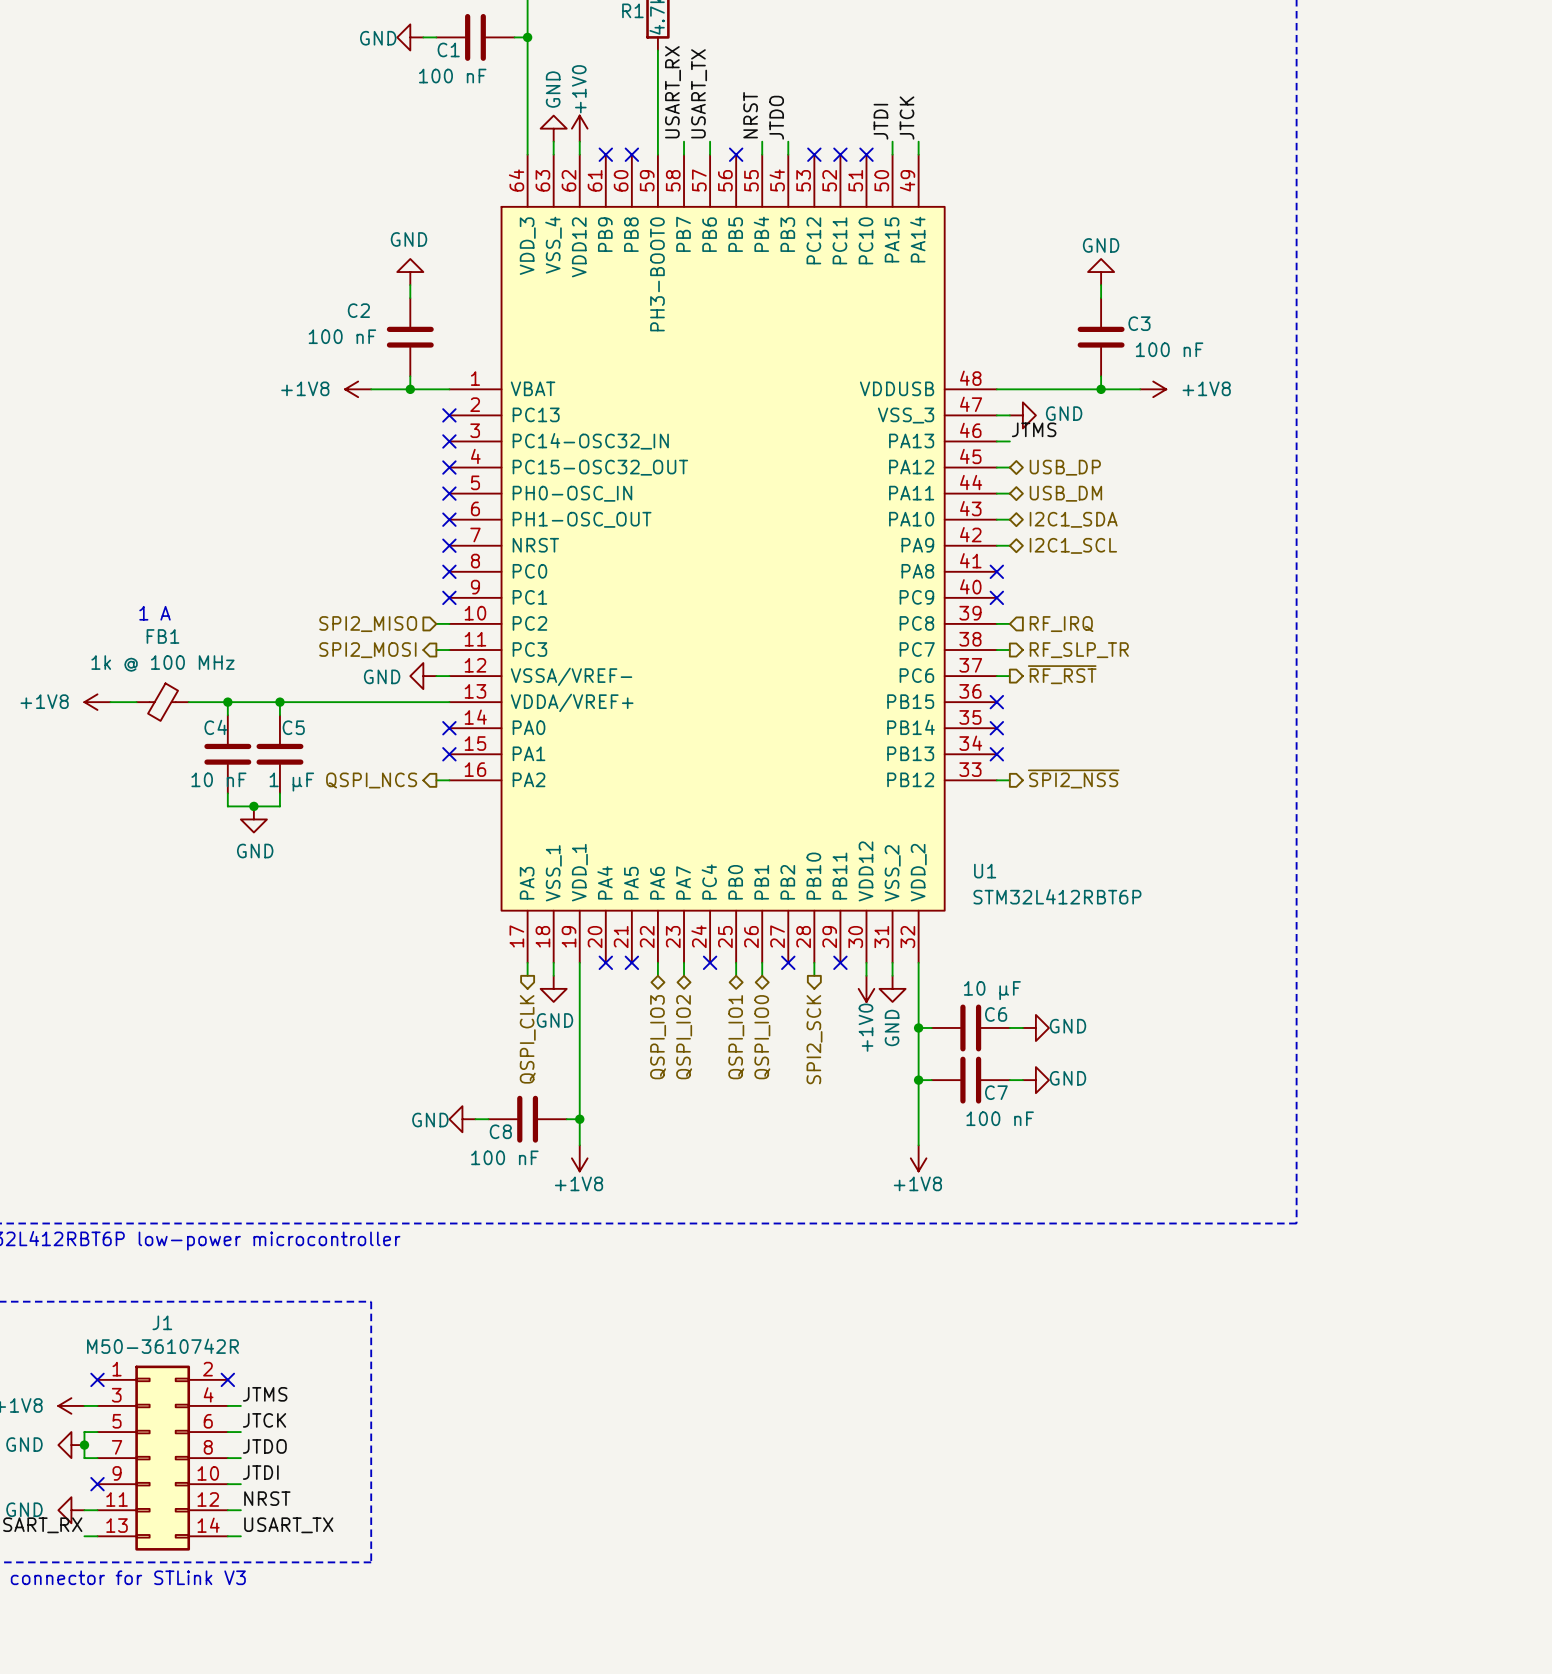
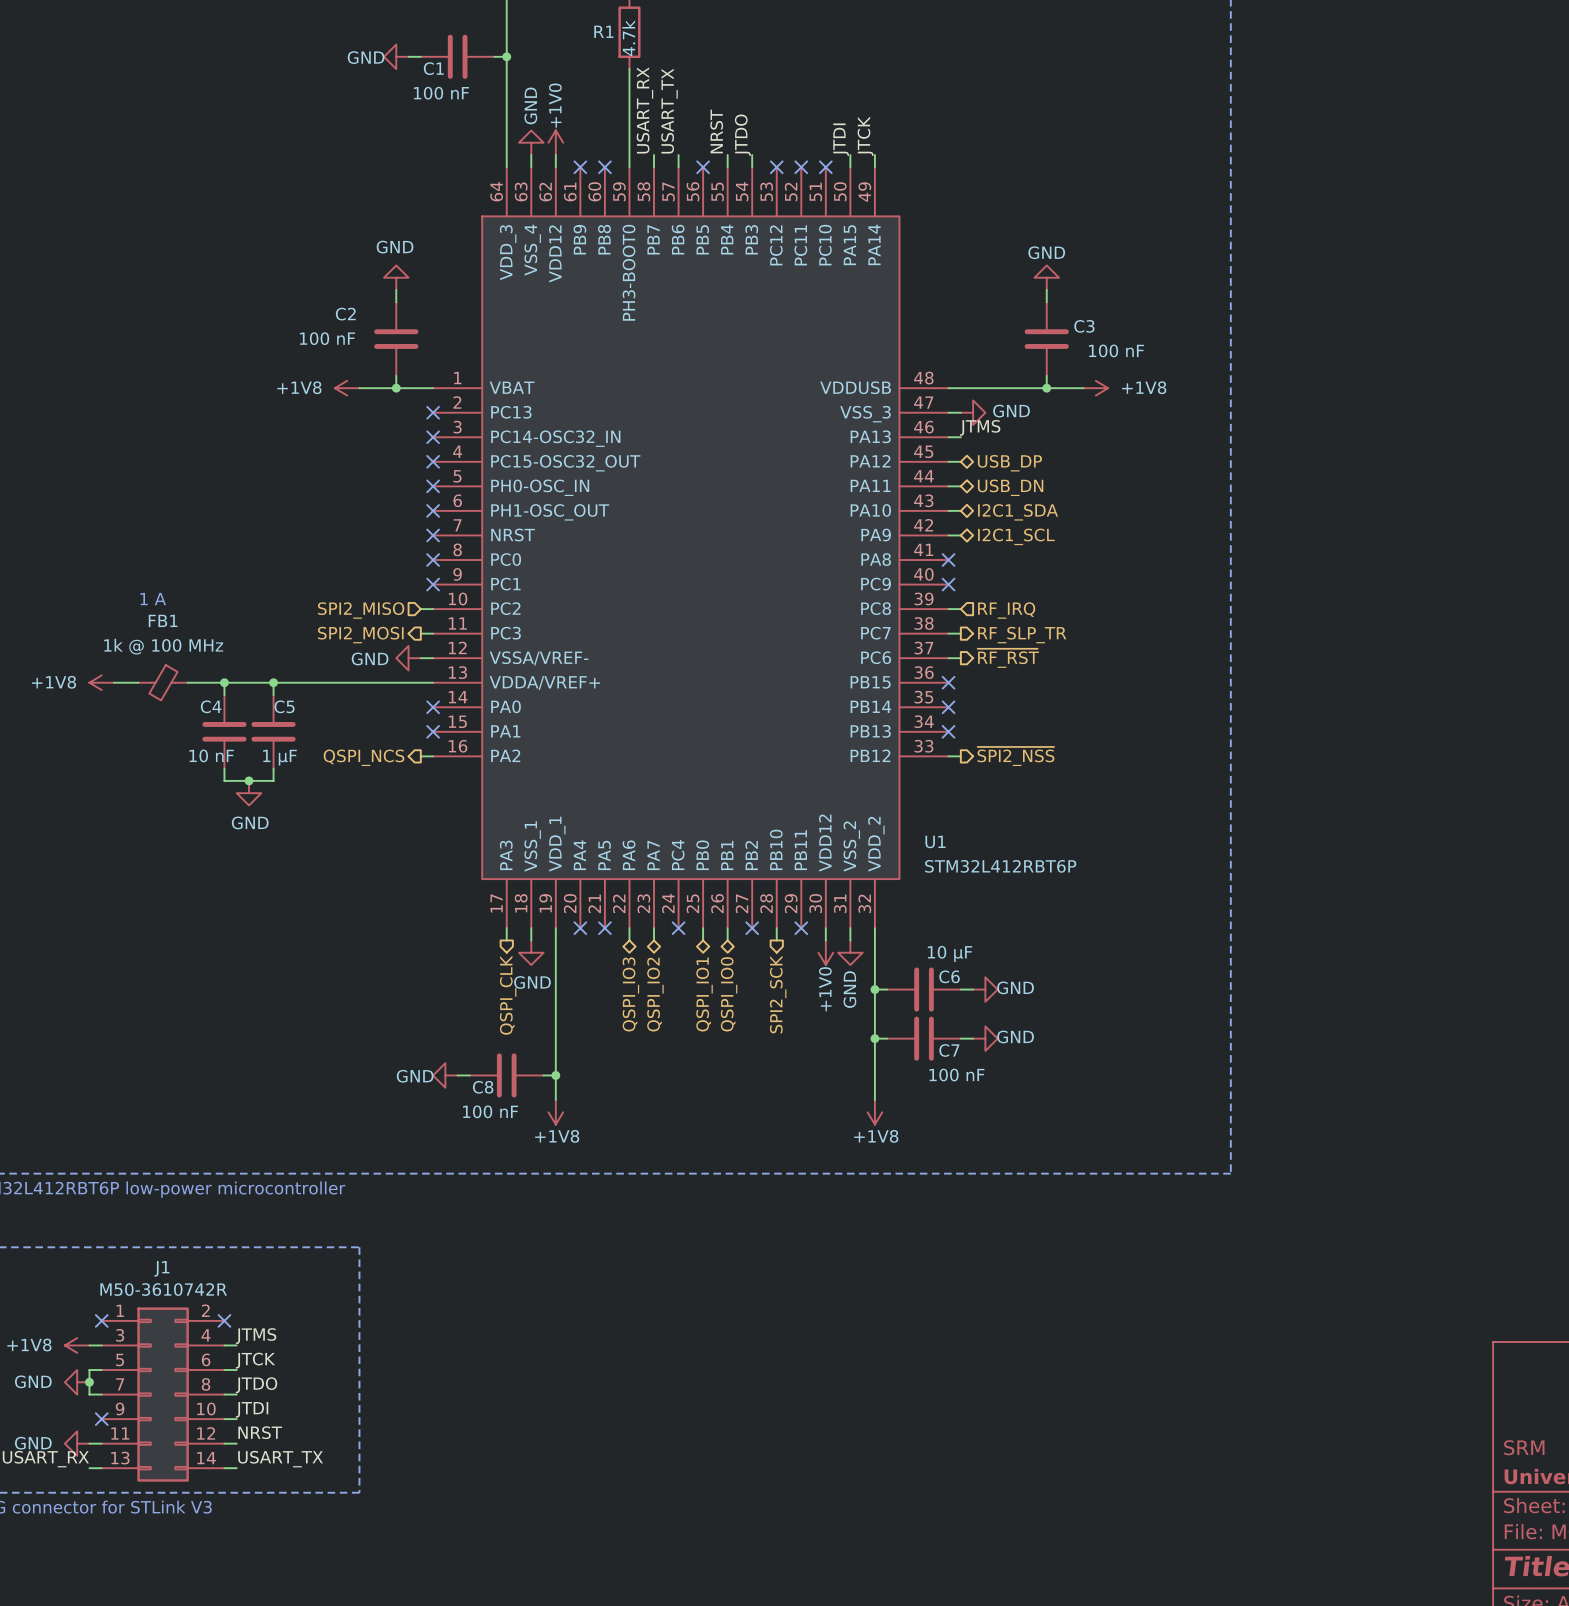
hierarchical label: USB_DM (1065, 493) -> USB_DN (1010, 487)

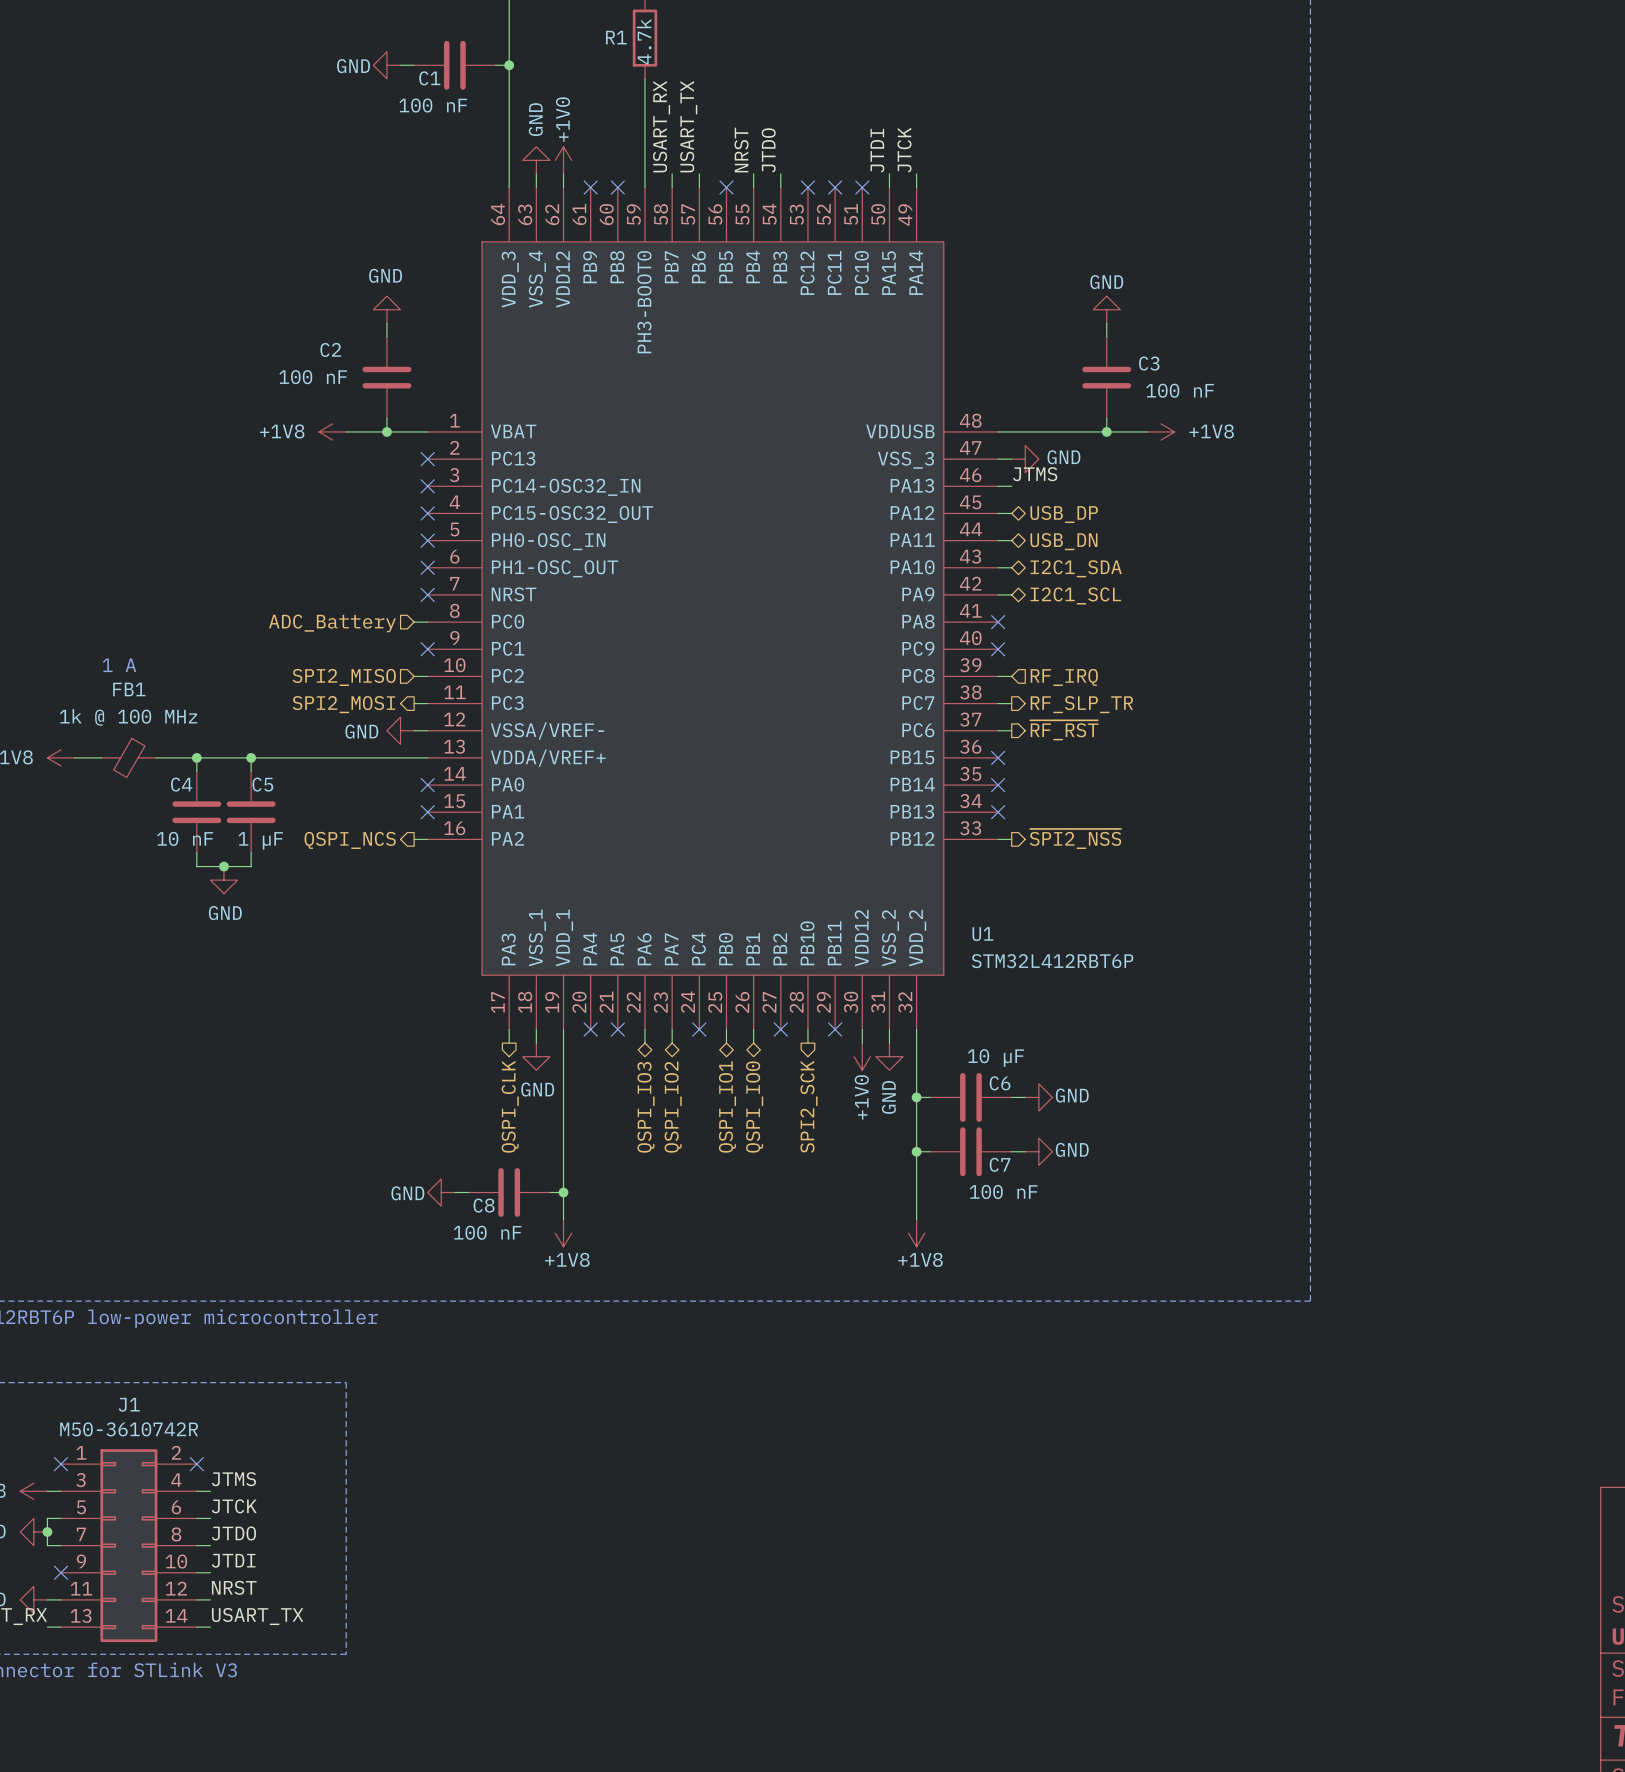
wire: none -> (414, 622) (427, 622)
no-connect mark: (433, 560) -> none
hierarchical label: none -> ADC_Battery (332, 623)

